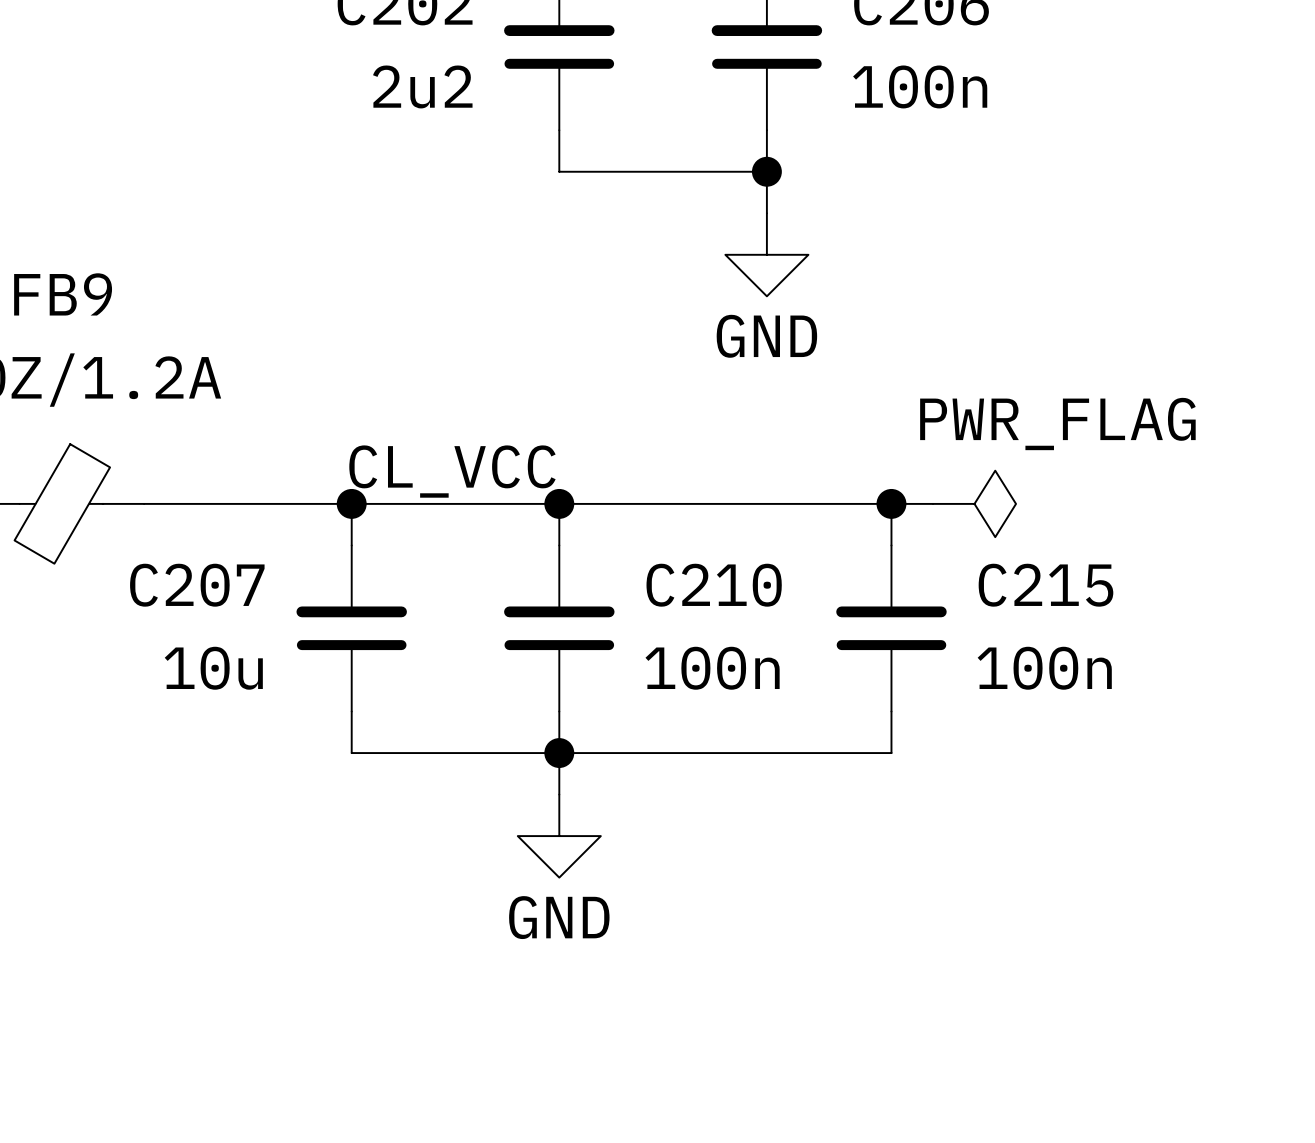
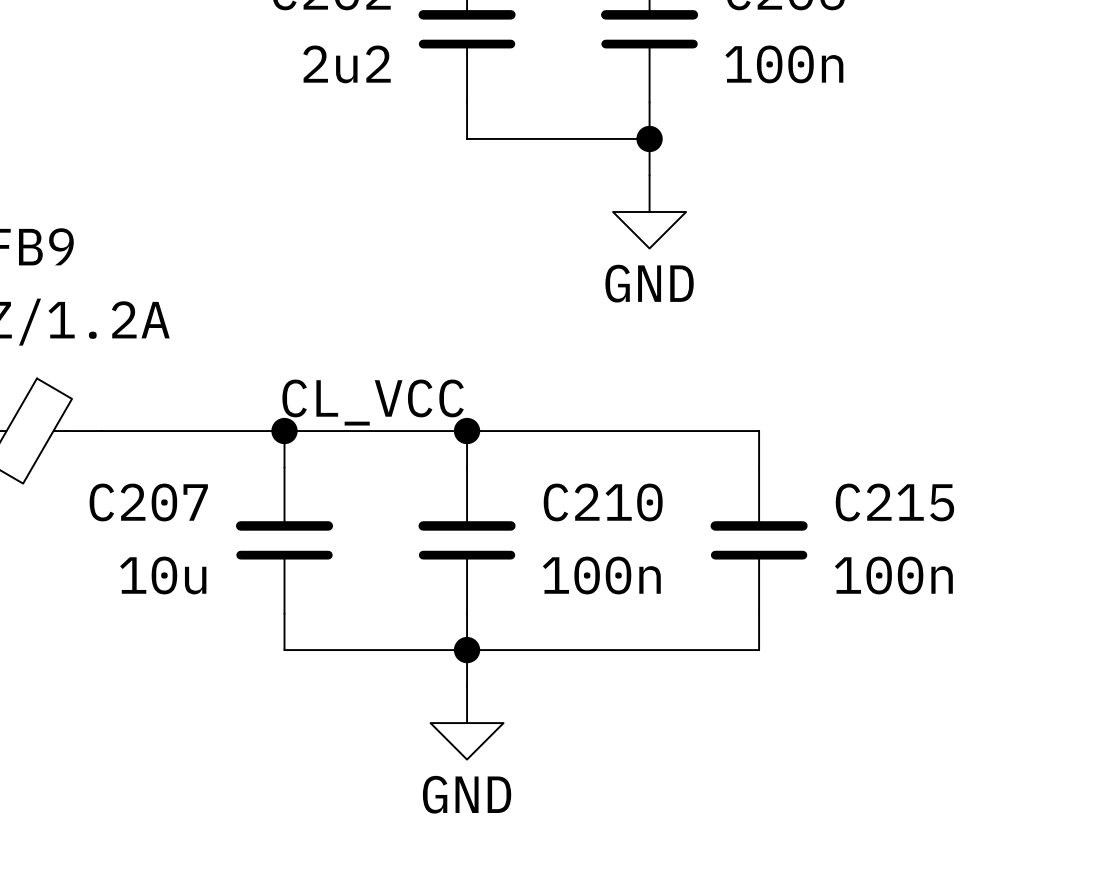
wire: (891, 503) (932, 503) -> none
junction: (891, 503) -> none
power symbol: PWR_FLAG (974, 503) -> none

